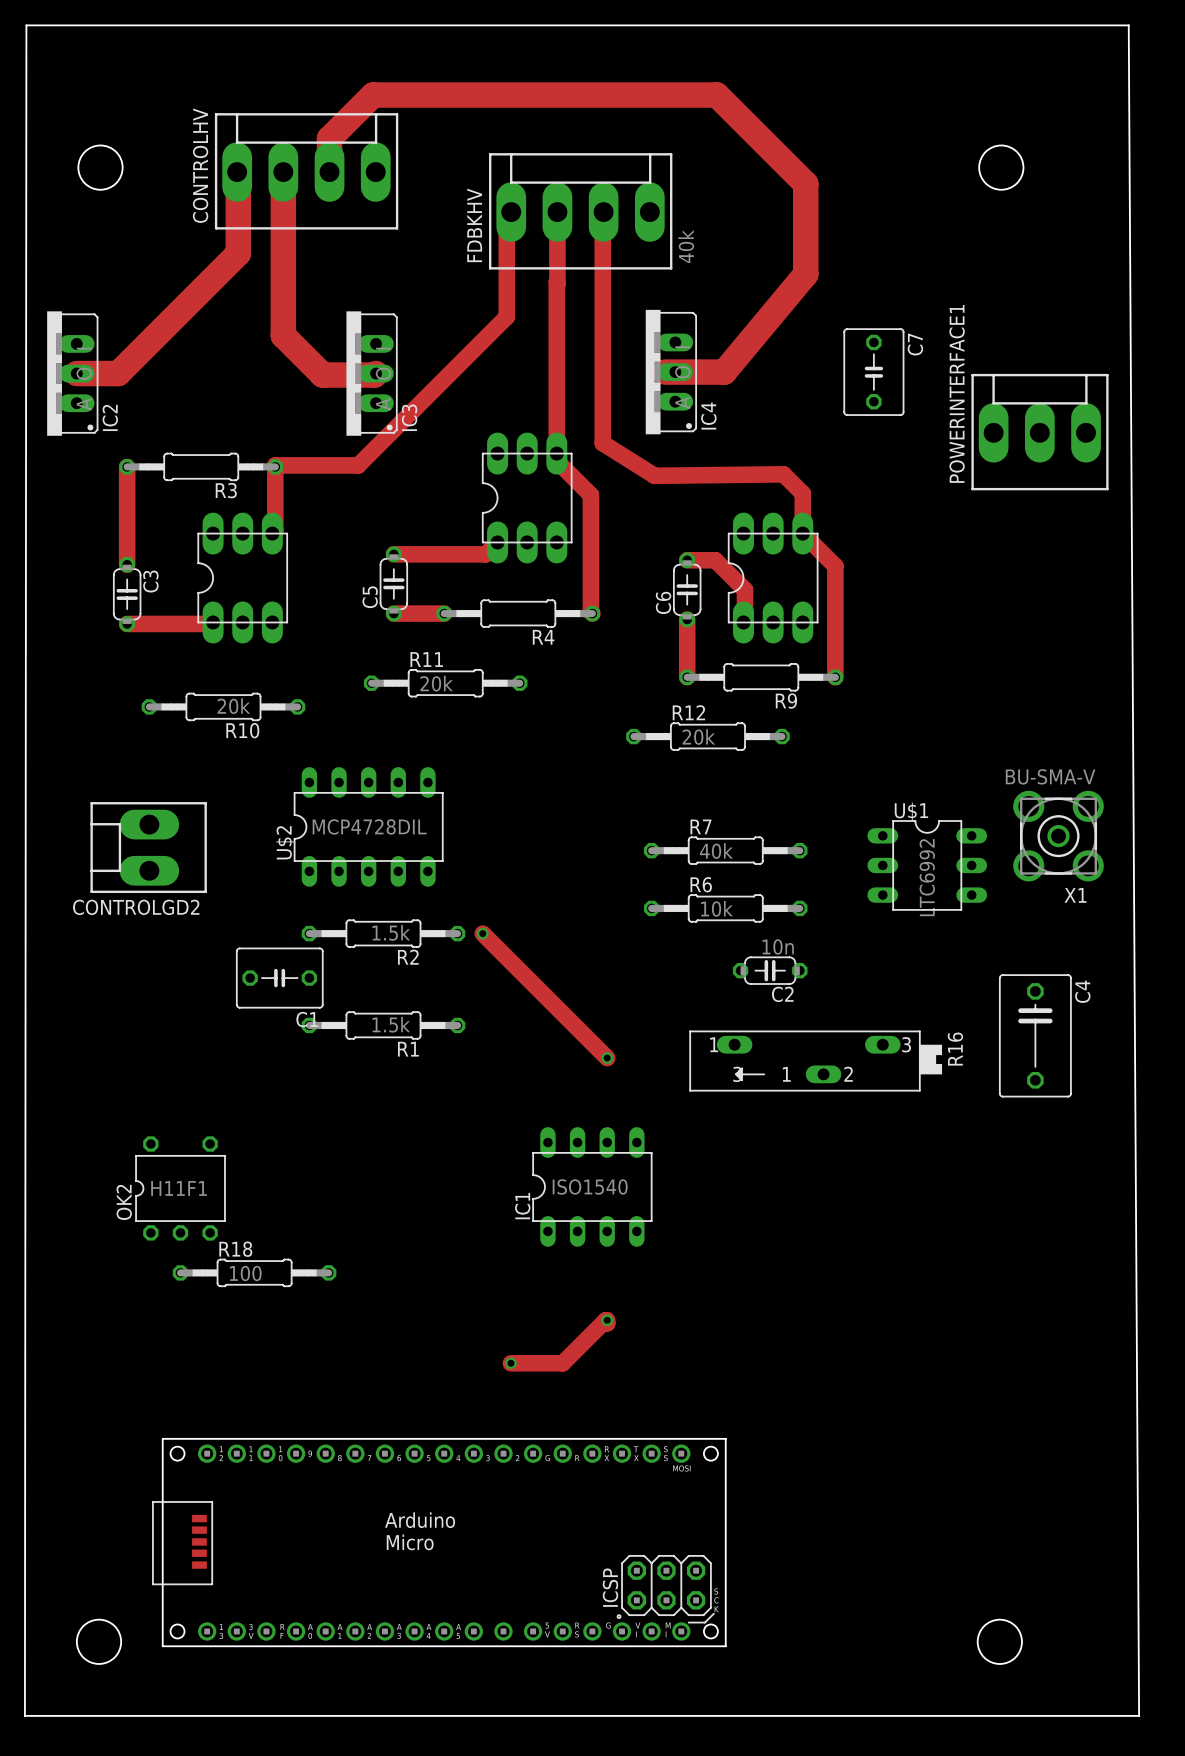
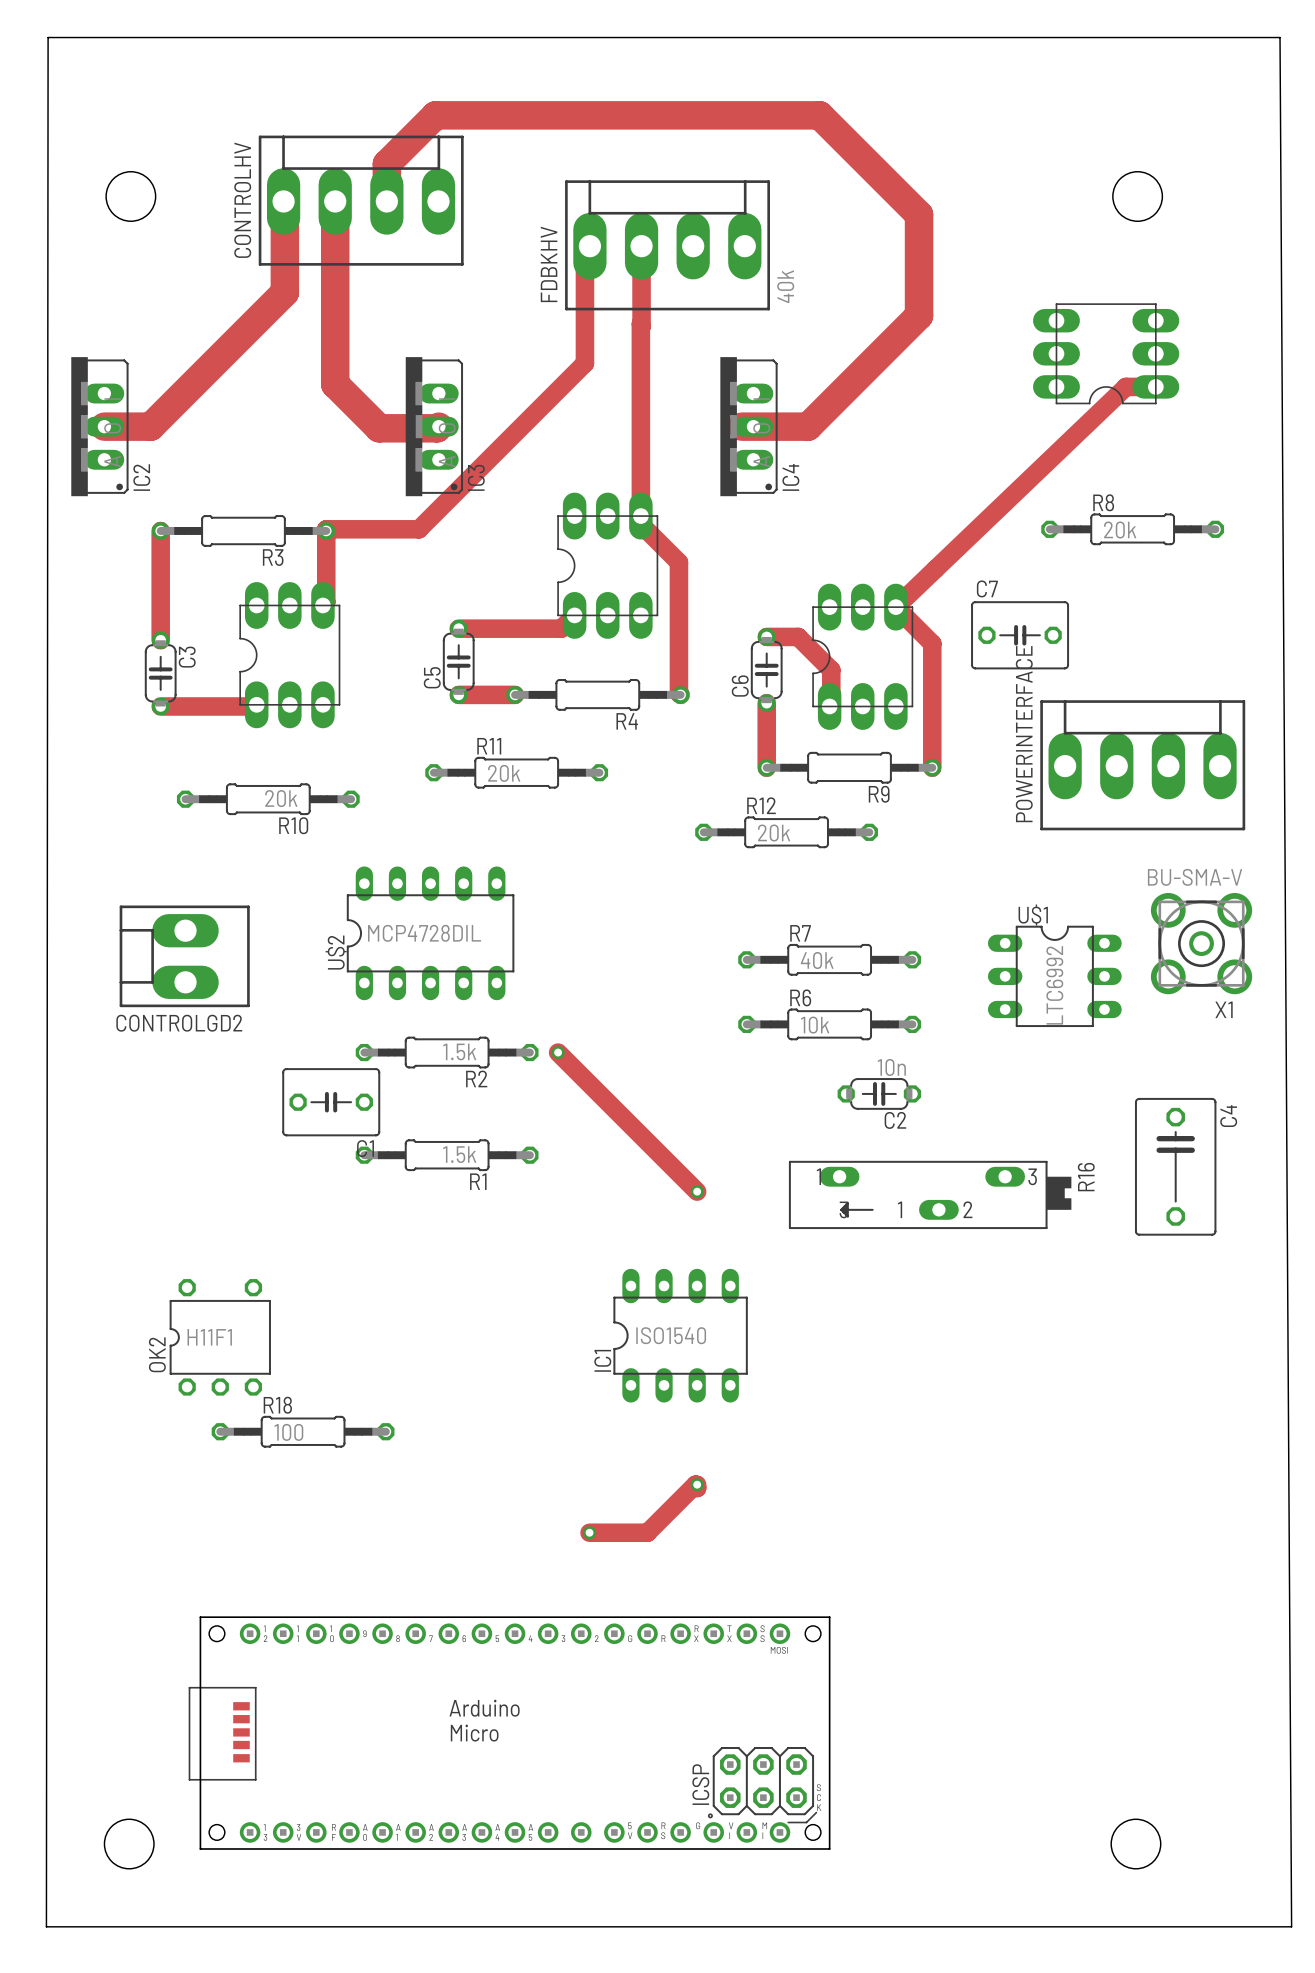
track: (603, 212) (602, 443) (654, 475) (783, 474) (802, 493) (802, 533) (835, 566) (835, 677) -> none
track: (805, 274) (724, 372) (664, 372) -> (919, 315) (808, 426) (741, 426)
part: none -> (1106, 353)
track: none -> (1155, 386) (1126, 386) (895, 607) (932, 643) (932, 767)
IC4 position: (671, 372) -> (748, 426)
C7 rotation: 0° (873, 372) -> 90° counterclockwise (1020, 635)
C7 position: (873, 372) -> (1020, 635)
POWERINTERFACE1: (1039, 432) -> none
R8: none -> 20k (1132, 529)
track: (687, 560) (715, 560) (745, 589) (743, 622) -> (766, 636) (798, 636) (831, 670) (831, 704) (829, 706)
part position: (773, 578) -> (862, 656)
C6 position: (687, 589) -> (766, 670)
track: (687, 619) (687, 677) -> (766, 703) (766, 767)
POWERINTERFACE: none -> (1142, 765)
R9 position: (761, 677) -> (849, 767)
R12 position: (707, 736) -> (786, 832)

